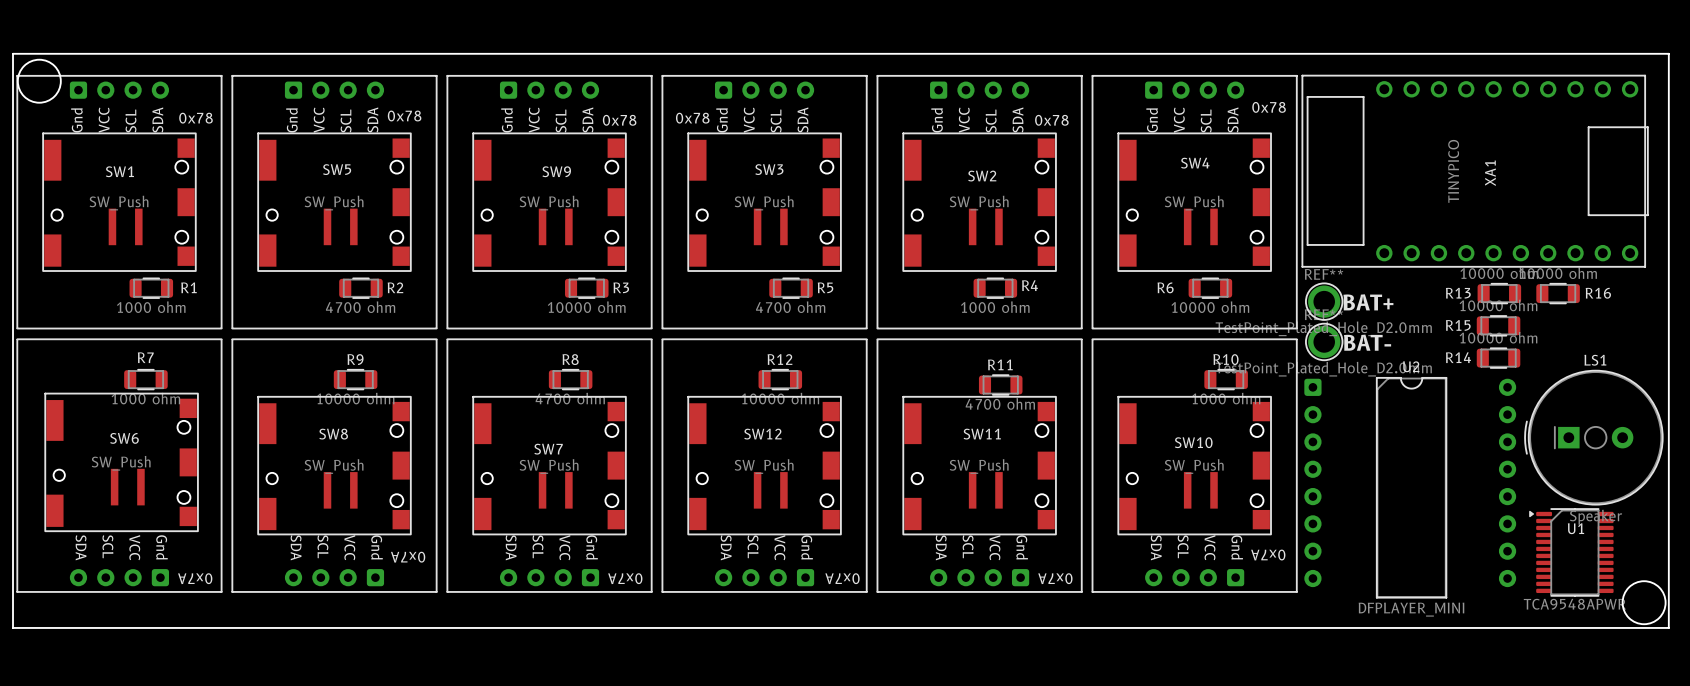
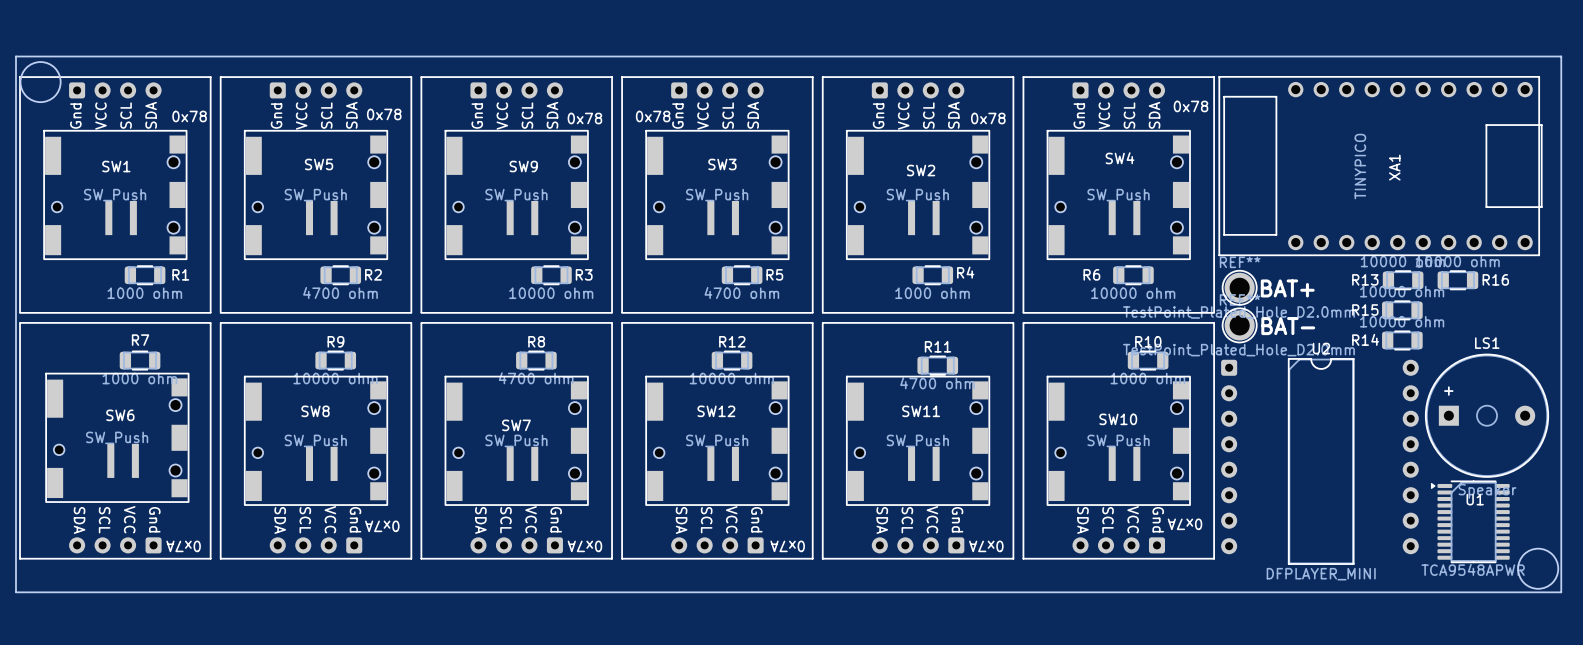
LS1 footprint: [1524, 370, 1664, 506] -> [1425, 353, 1549, 478]

